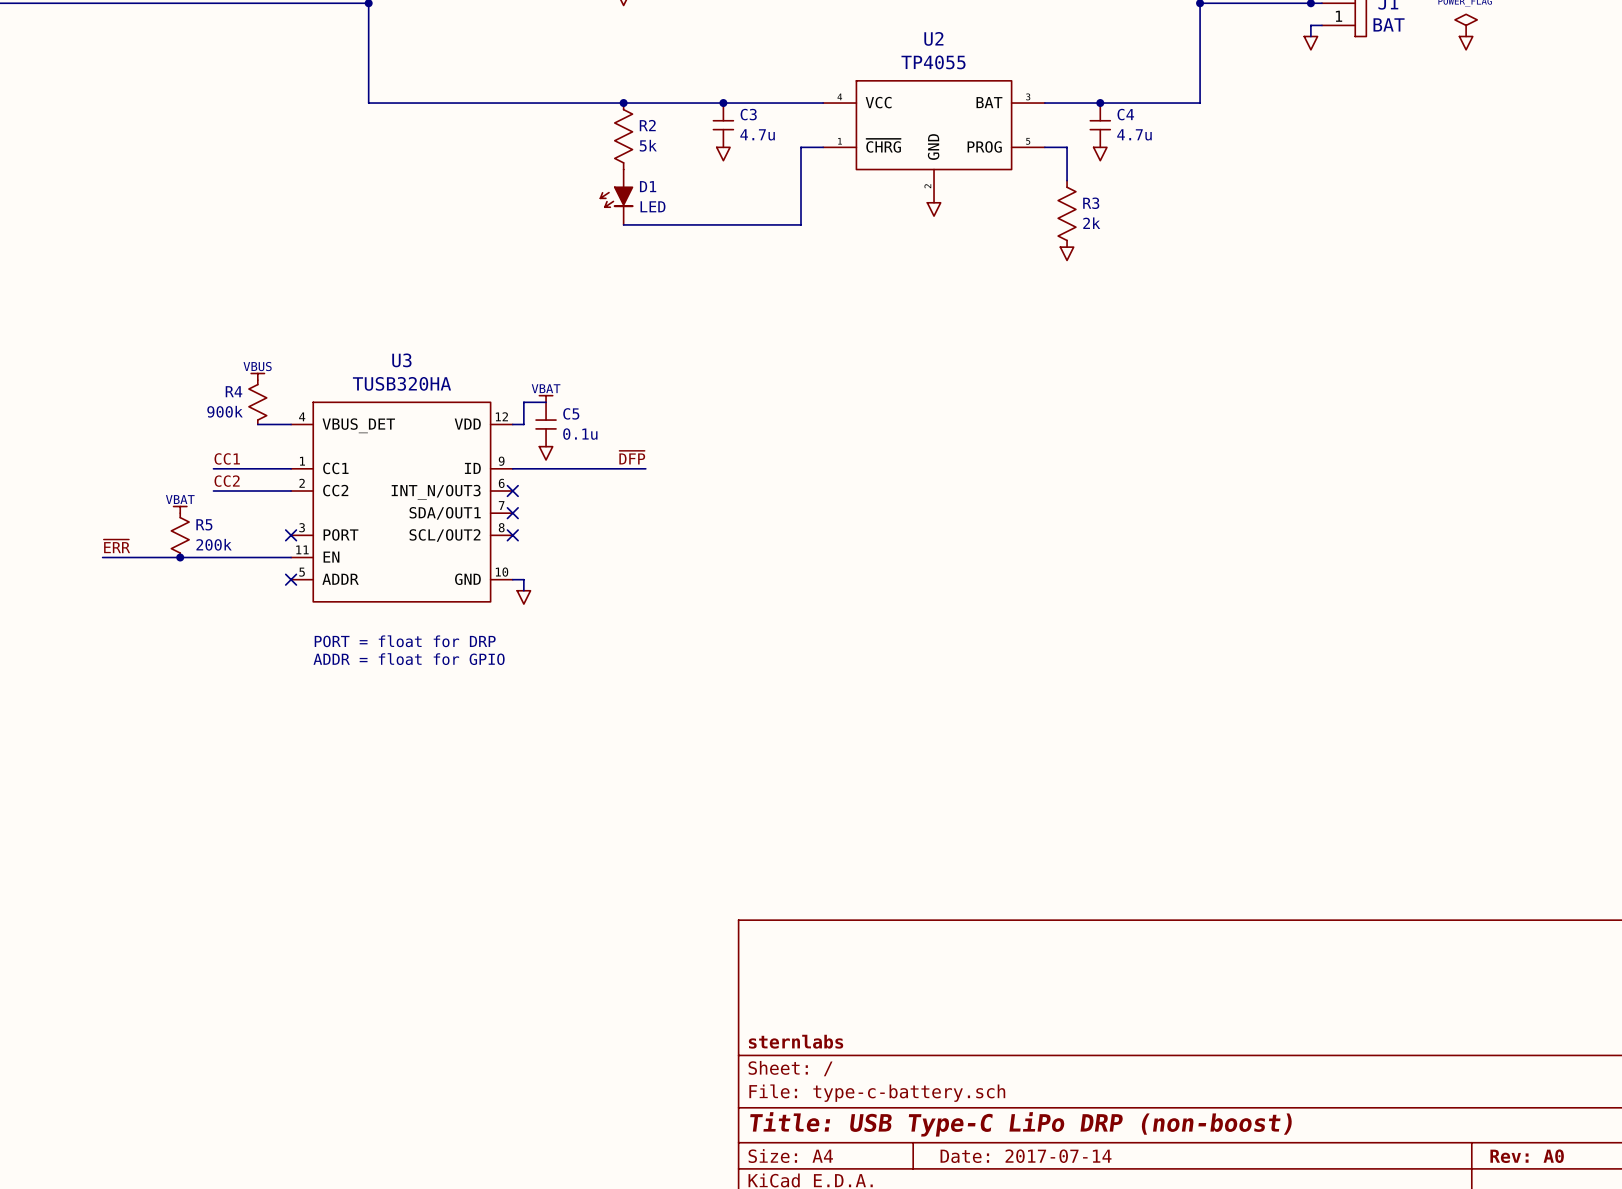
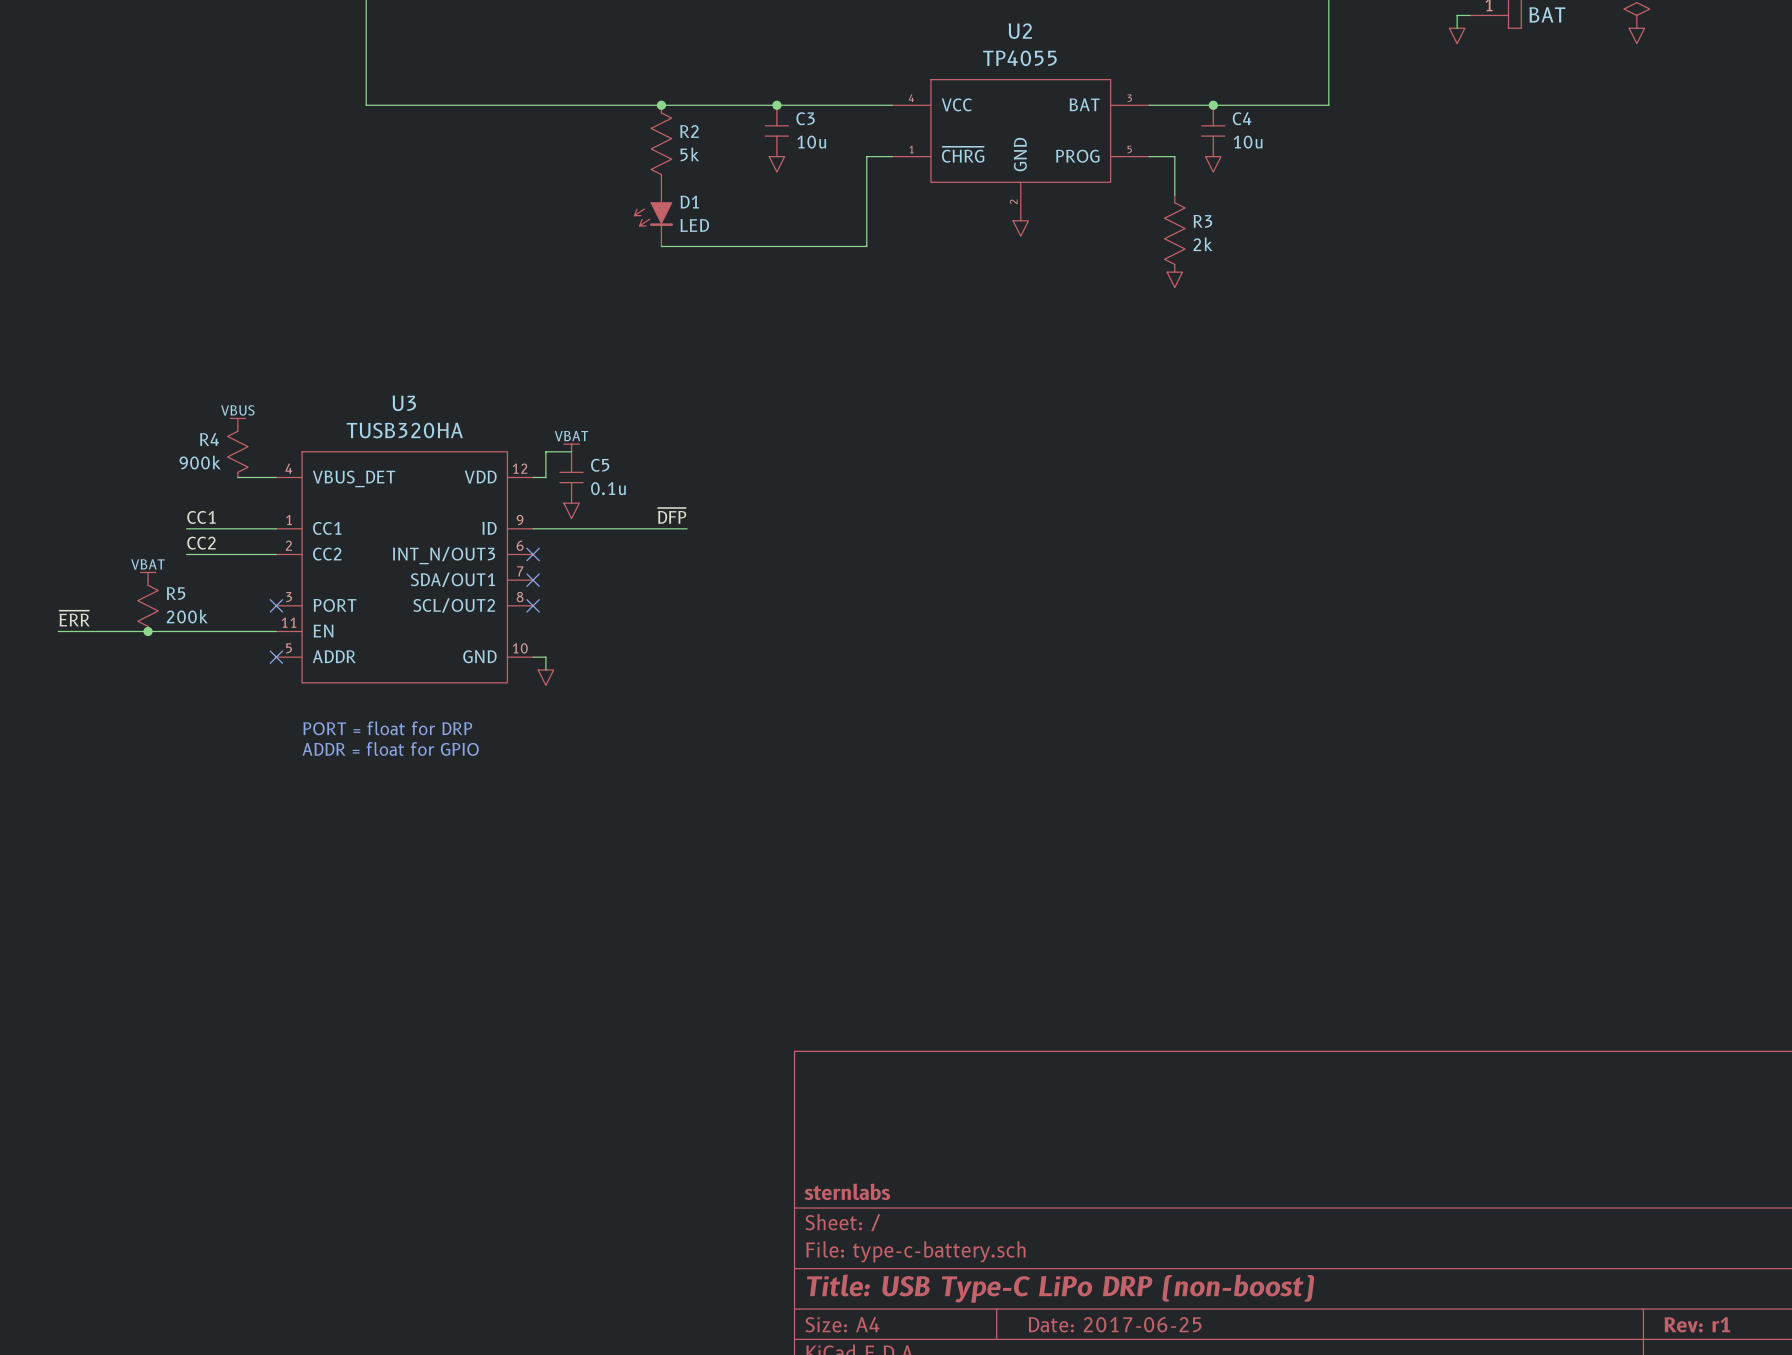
C3 value: 4.7u (757, 134) -> 10u (811, 142)
C4 value: 4.7u (1134, 134) -> 10u (1248, 142)
title block: Date: 2017-07-14 (1026, 1156) -> Date: 2017-06-25 (1115, 1324)
title block: Rev: A0 (1527, 1156) -> Rev: r1 (1697, 1324)

